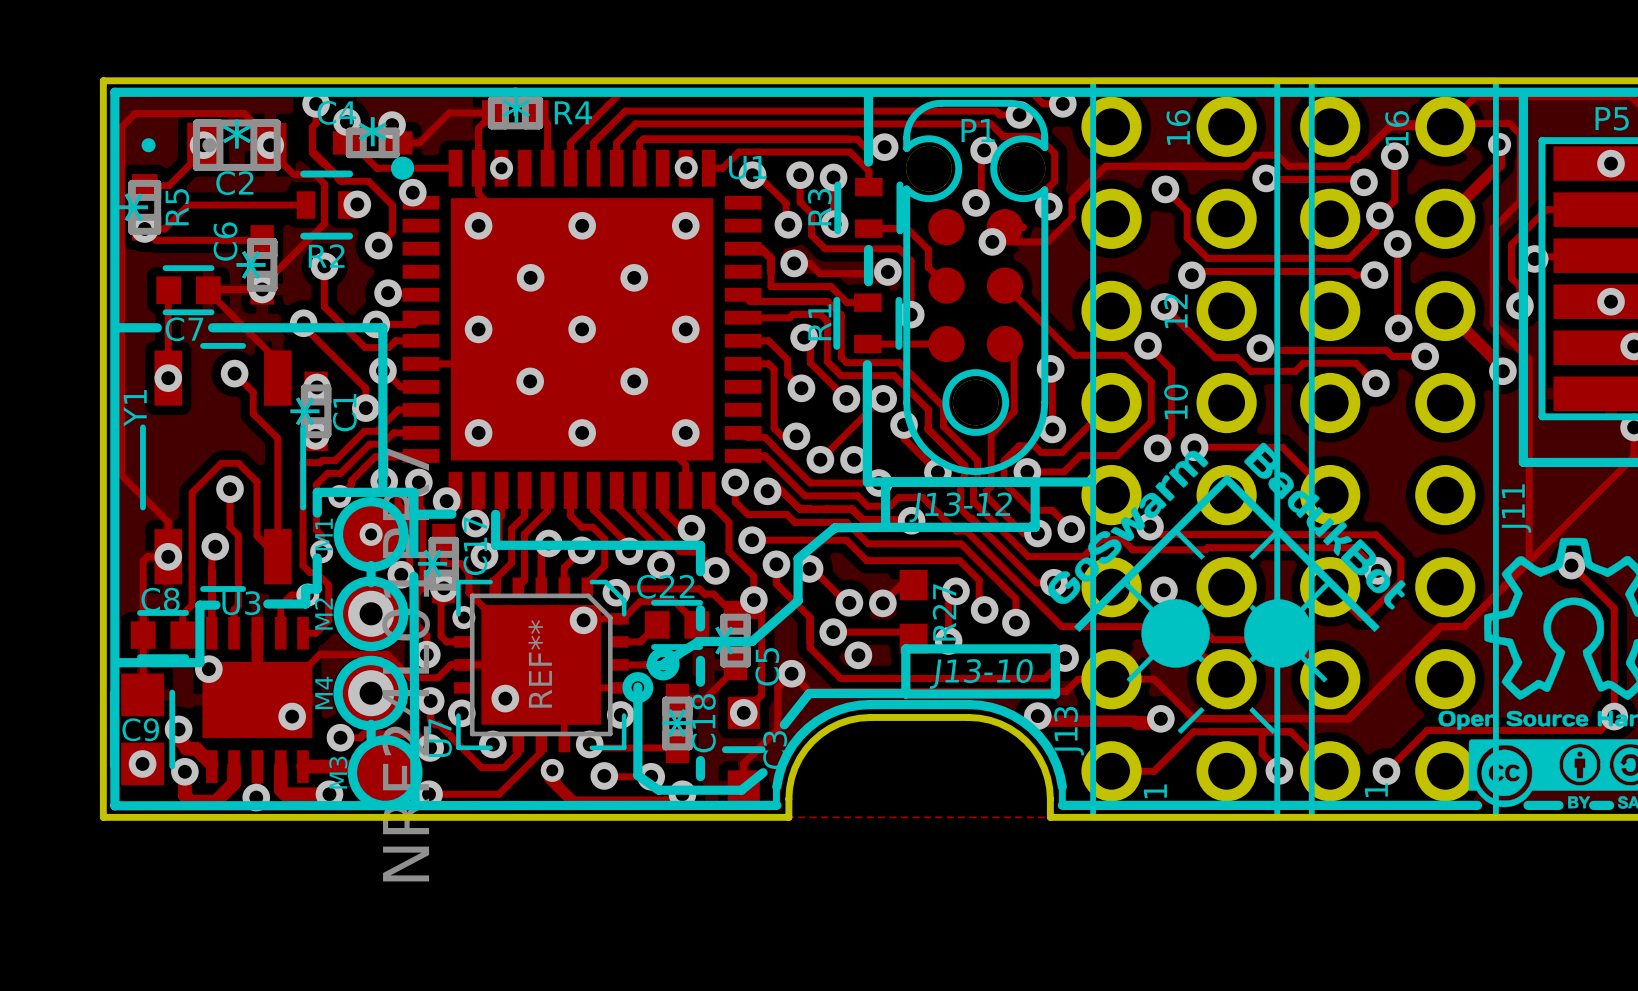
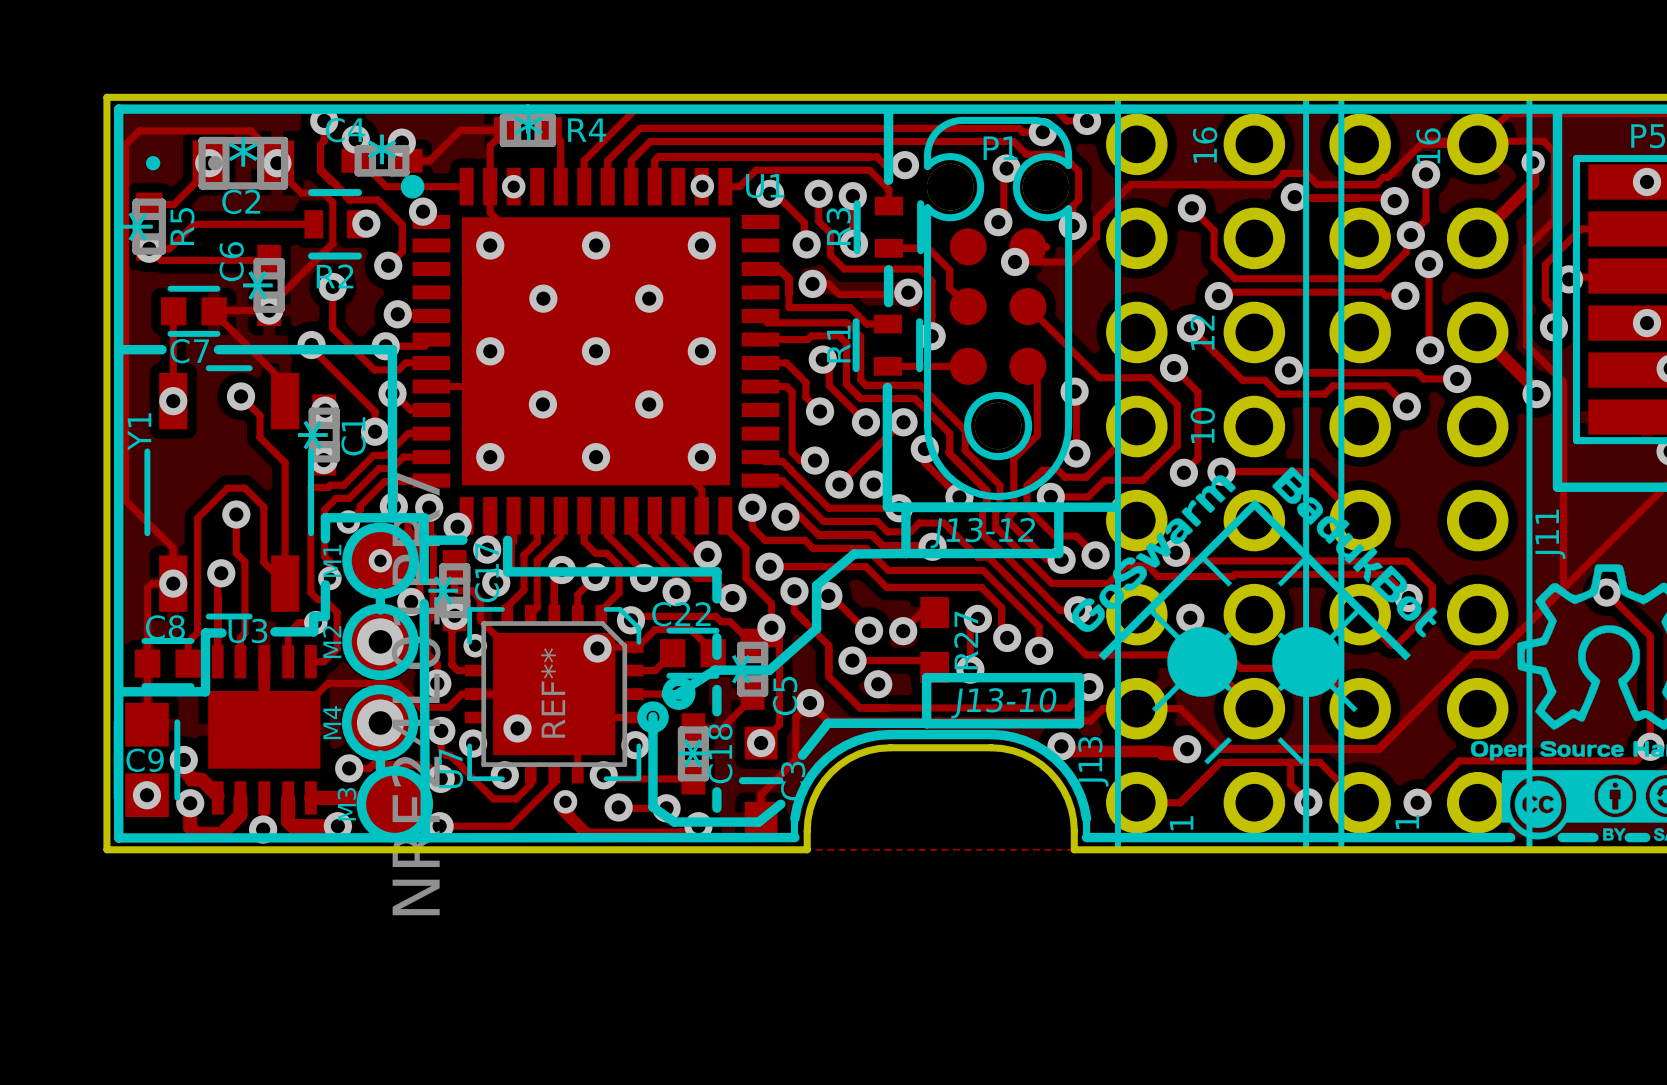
via: (208, 669) -> none
via: (292, 716) -> none

